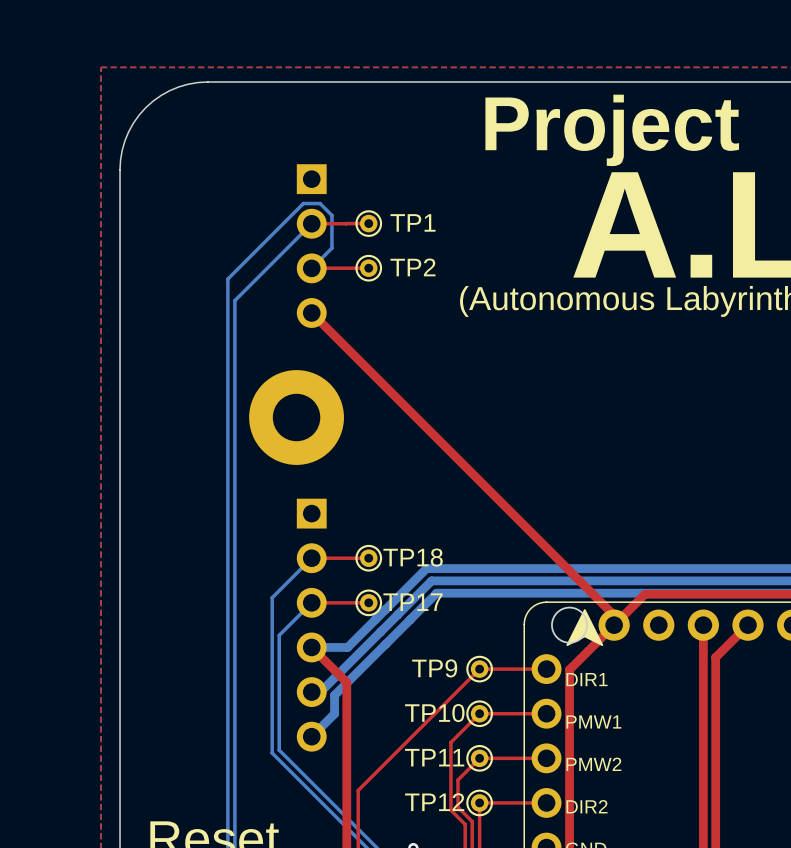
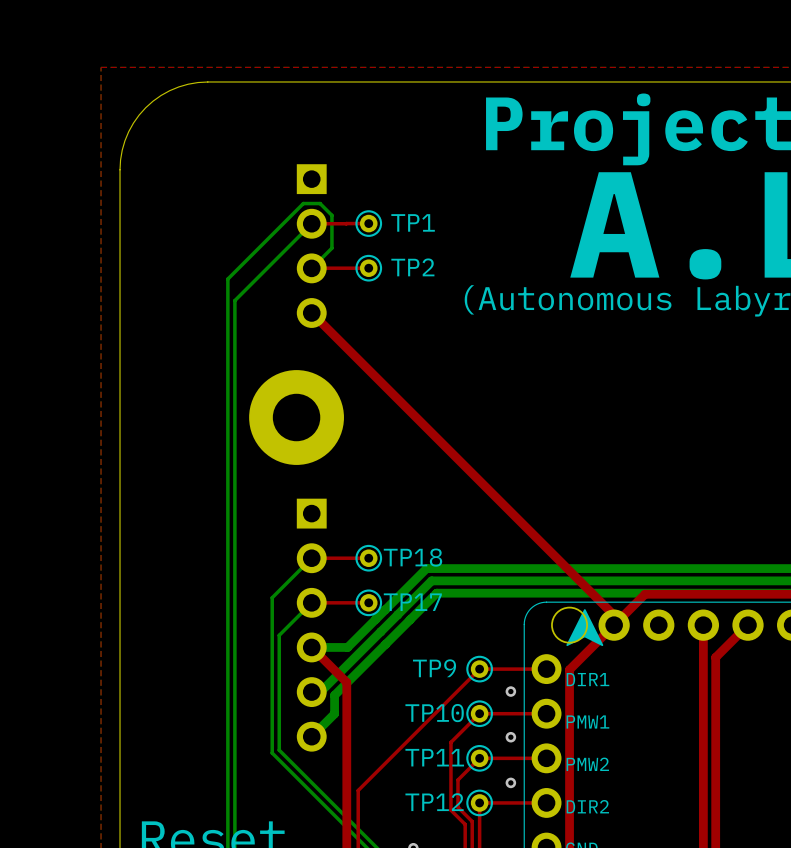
via: none -> (510, 691)
via: none -> (510, 737)
via: none -> (510, 782)

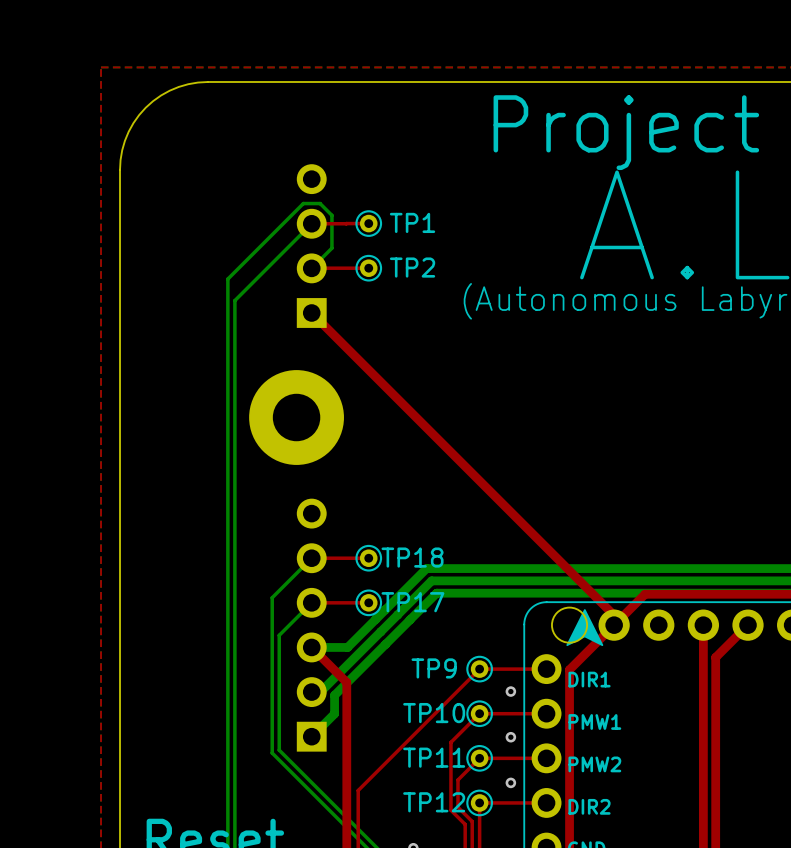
part rotation: 0° (311, 246) -> 180° (311, 246)
part rotation: 0° (311, 625) -> 180° (311, 625)

